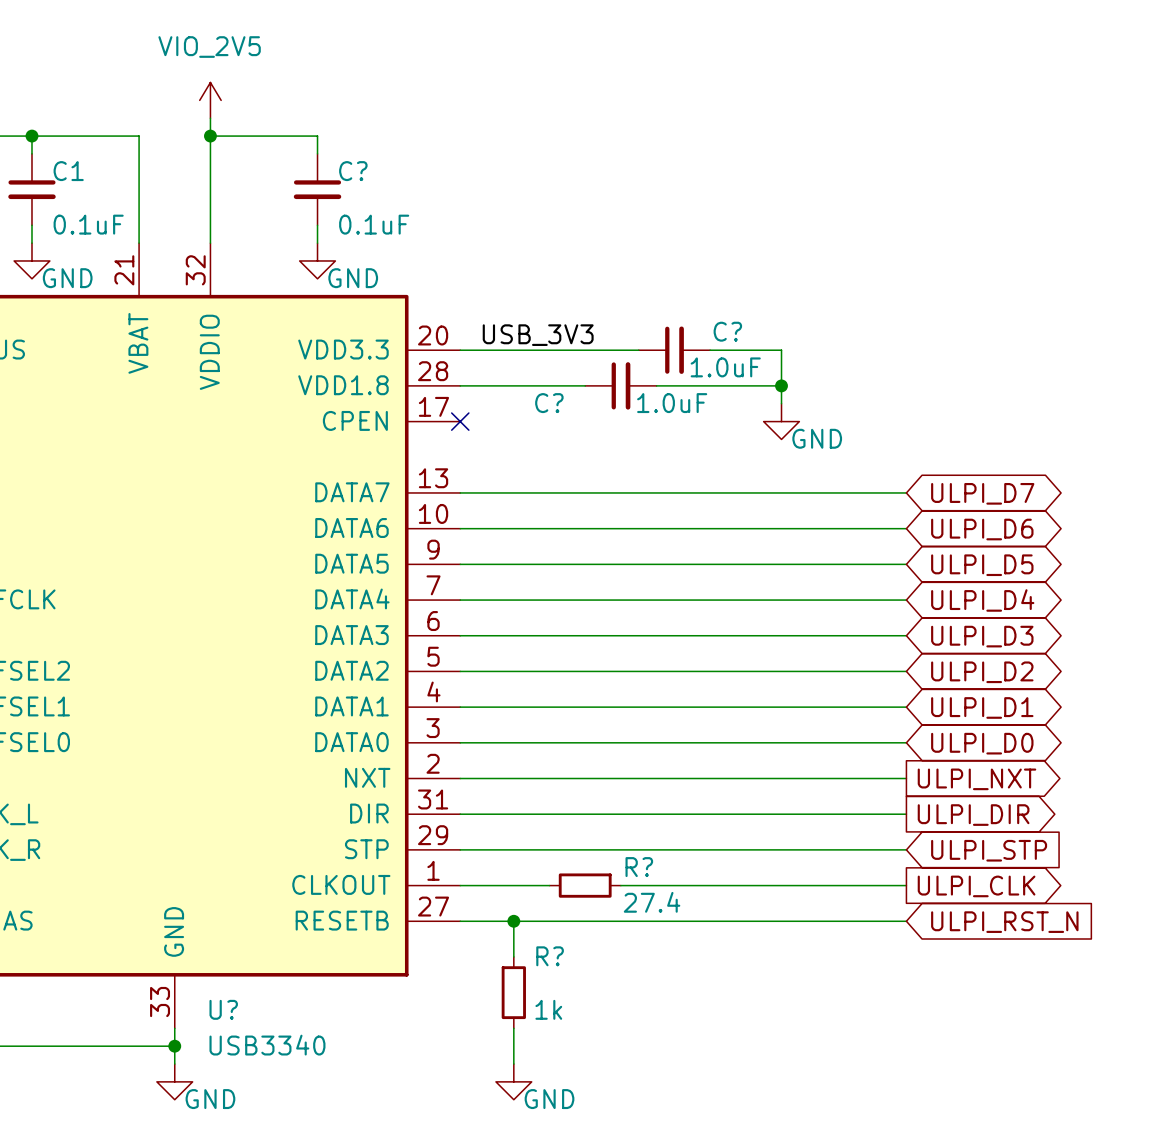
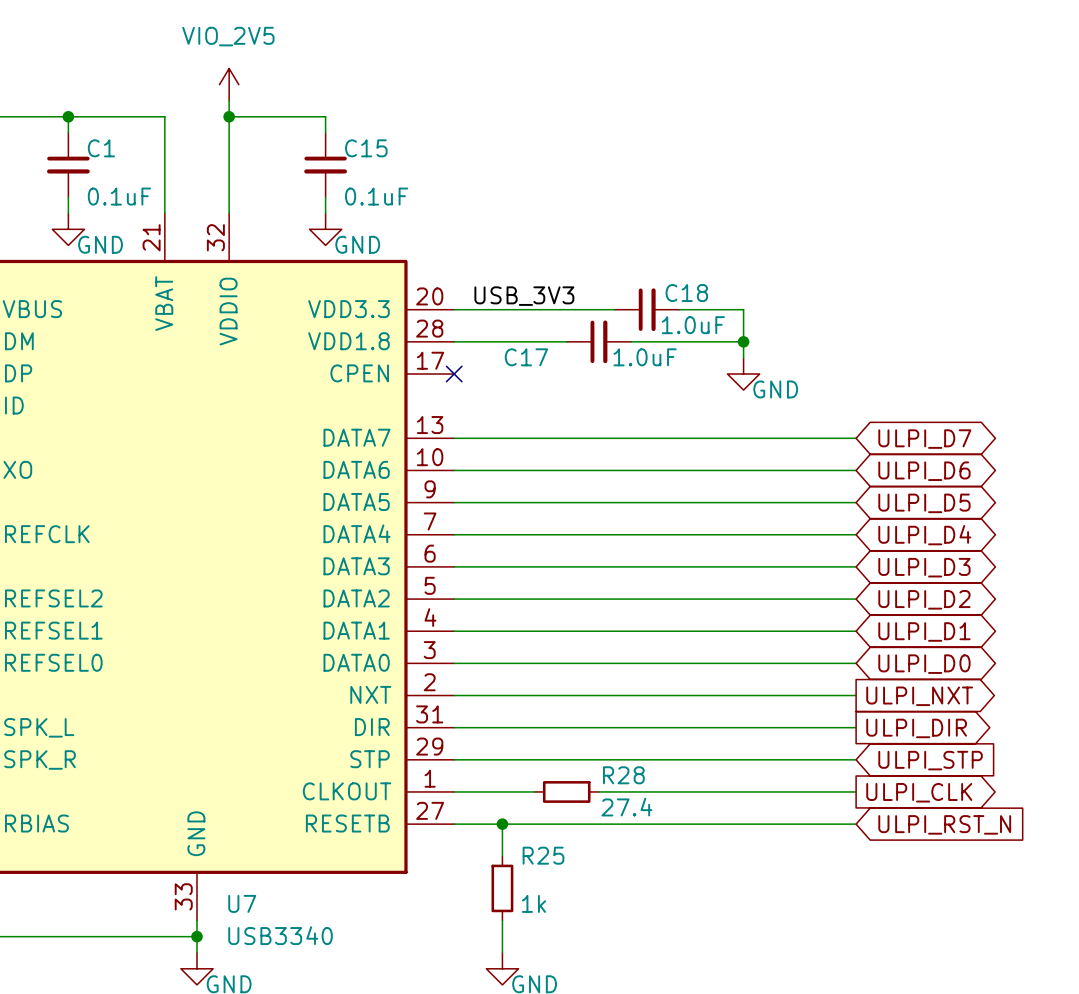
C? name: C? (353, 171) -> C15 (366, 148)
C? name: C? (727, 331) -> C18 (686, 293)
C? name: C? (549, 403) -> C17 (526, 357)
R? name: R? (639, 867) -> R28 (623, 775)
R? name: R? (550, 956) -> R25 (543, 855)
U? name: U? (223, 1009) -> U7 (242, 903)

